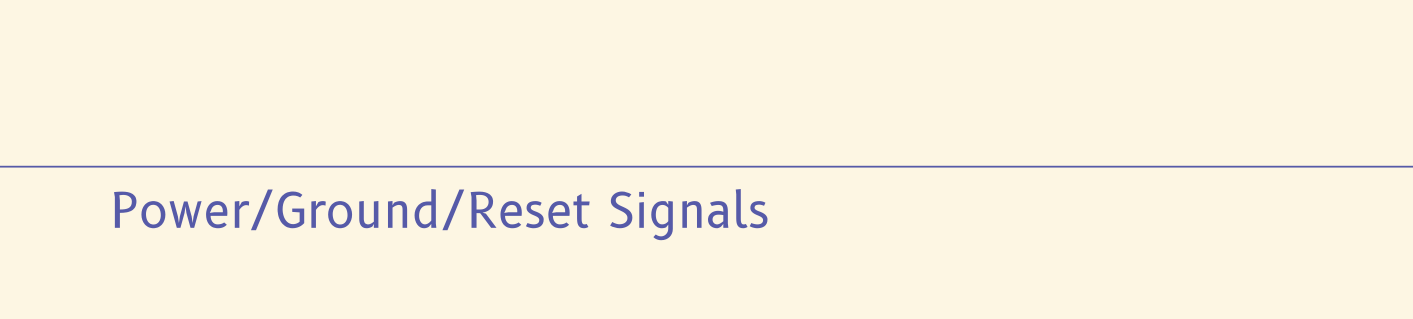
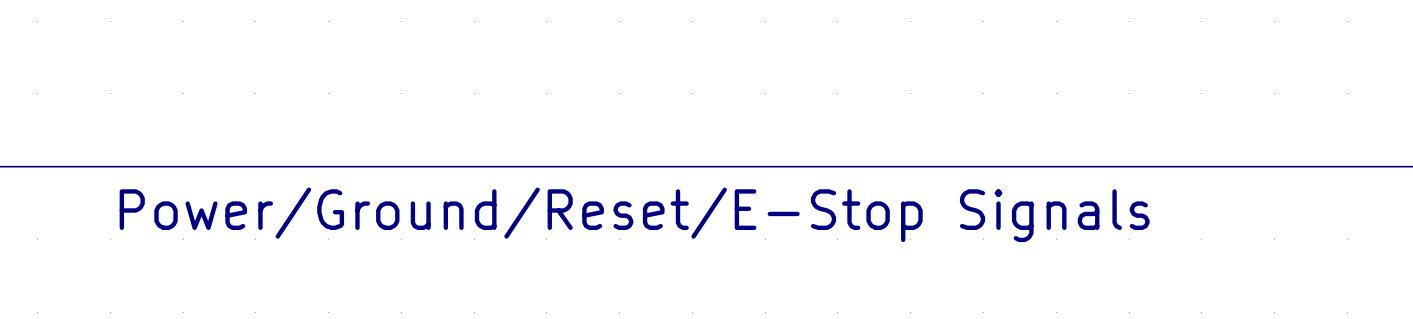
text: Power/Ground/Reset Signals (440, 214) -> Power/Ground/Reset/E-Stop Signals (634, 214)

